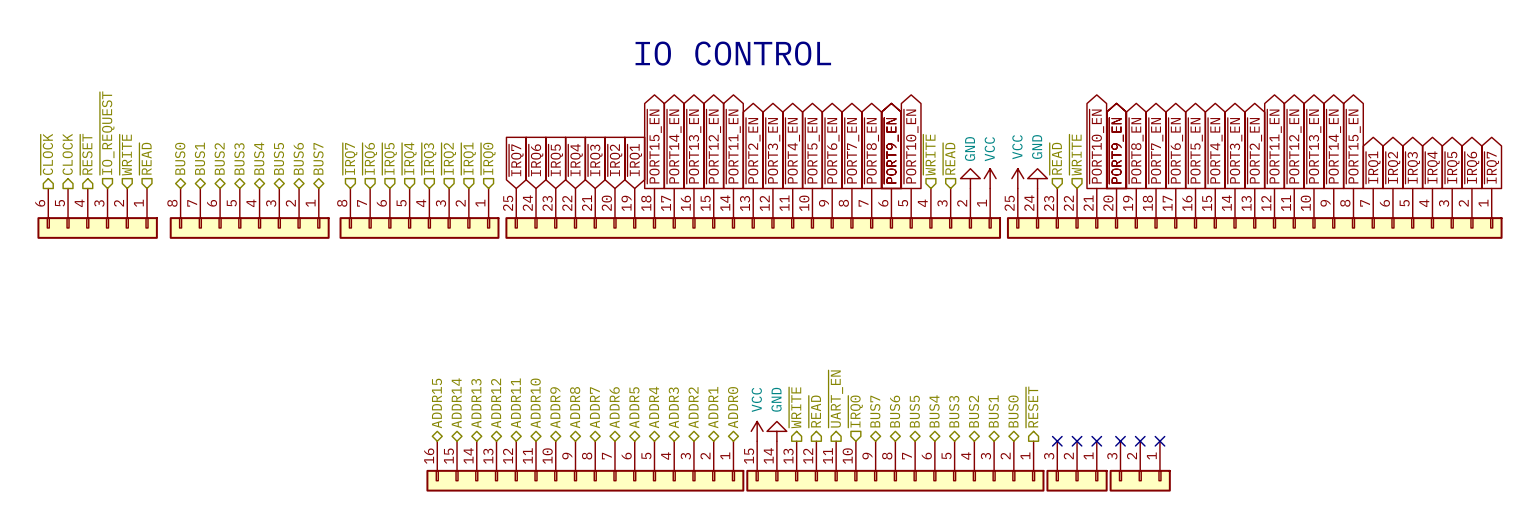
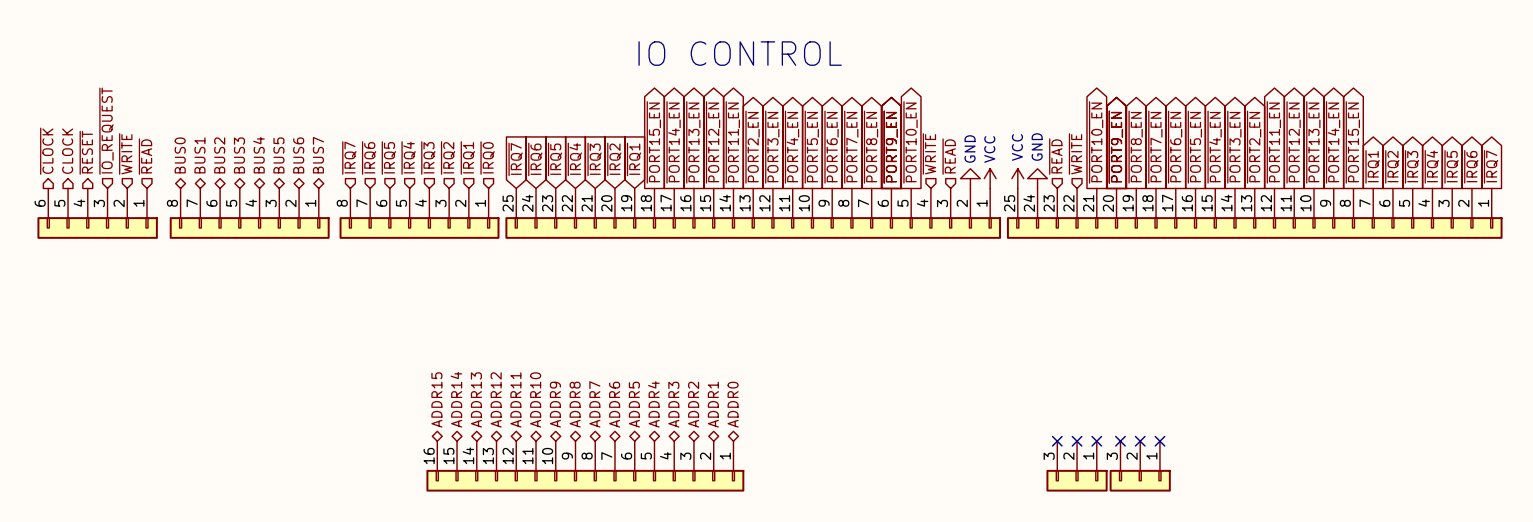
hierarchical label: ~{UART_EN} (835, 398) -> none
hierarchical label: ~{WRITE} (795, 407) -> none
hierarchical label: ~{RESET} (1032, 407) -> none
hierarchical label: ~{READ} (814, 411) -> none
hierarchical label: ~{IRQ0} (855, 411) -> none
hierarchical label: BUS7 (875, 411) -> none
hierarchical label: BUS6 (895, 411) -> none
hierarchical label: BUS5 (914, 411) -> none
hierarchical label: BUS4 (934, 411) -> none
hierarchical label: BUS3 (954, 411) -> none
hierarchical label: BUS2 (973, 411) -> none
hierarchical label: BUS1 (993, 411) -> none
hierarchical label: BUS0 (1013, 411) -> none
power symbol: VCC (757, 431) -> none
power symbol: GND (776, 431) -> none
part: (895, 466) -> none

